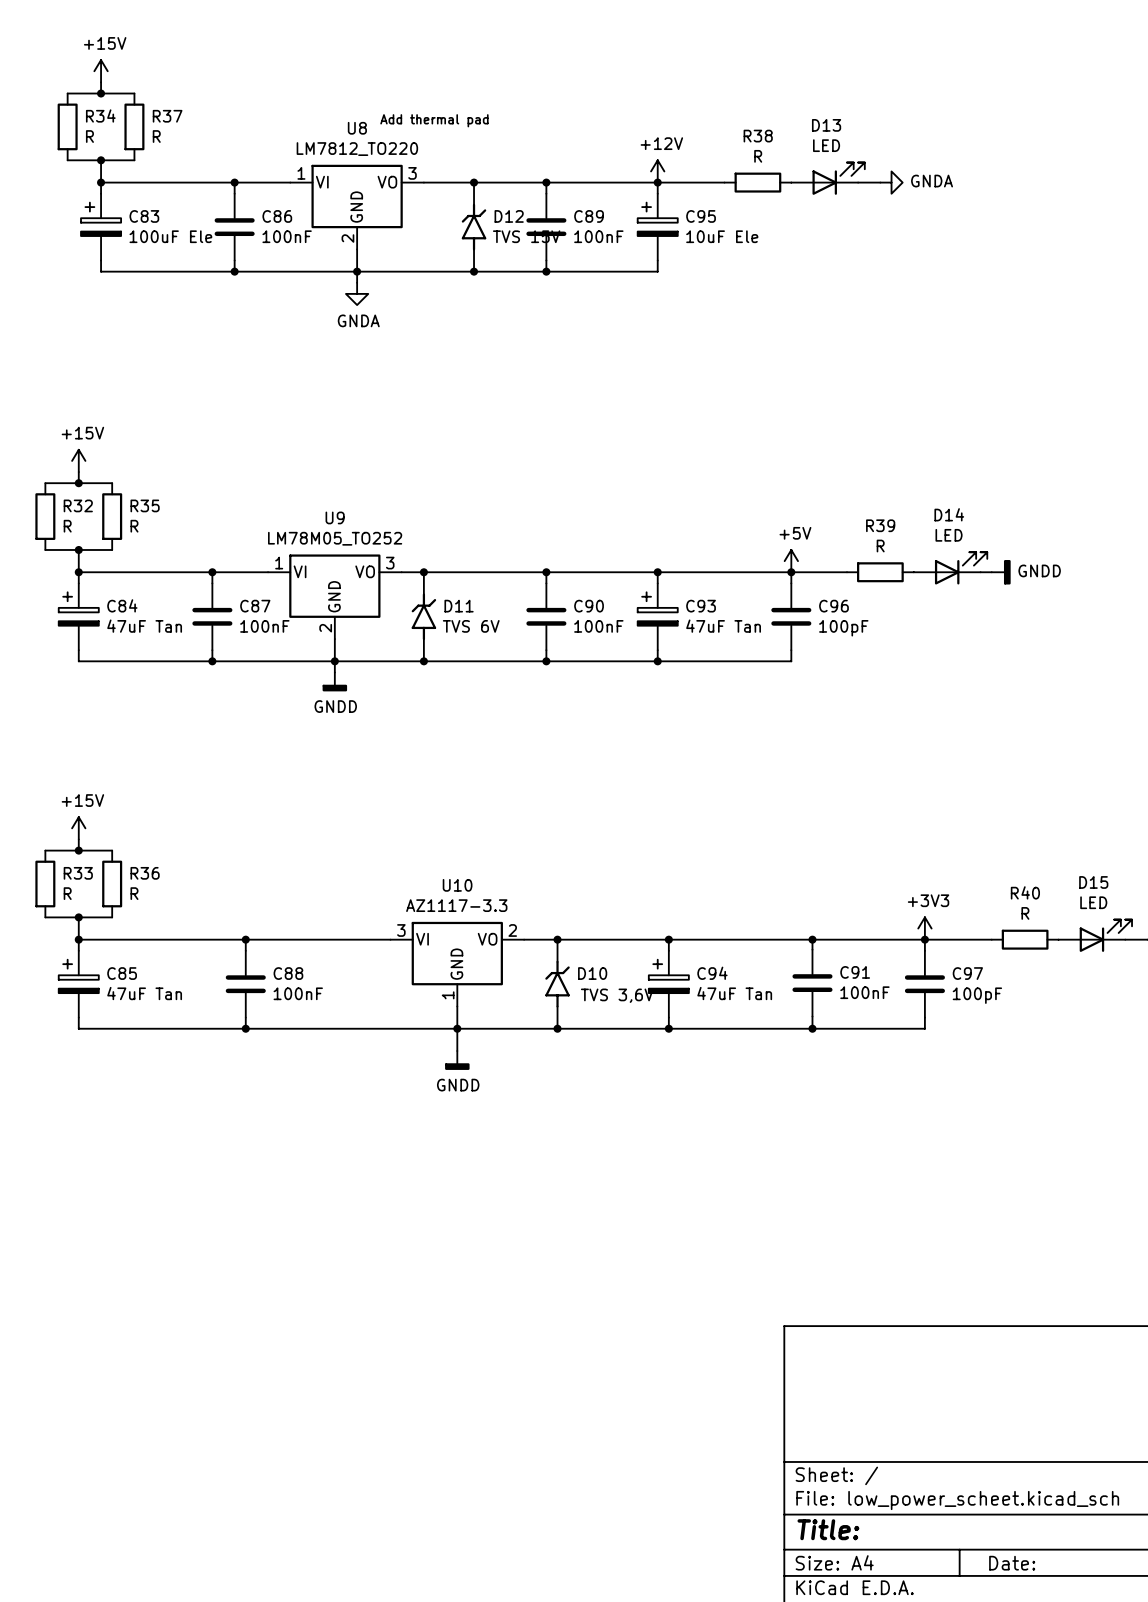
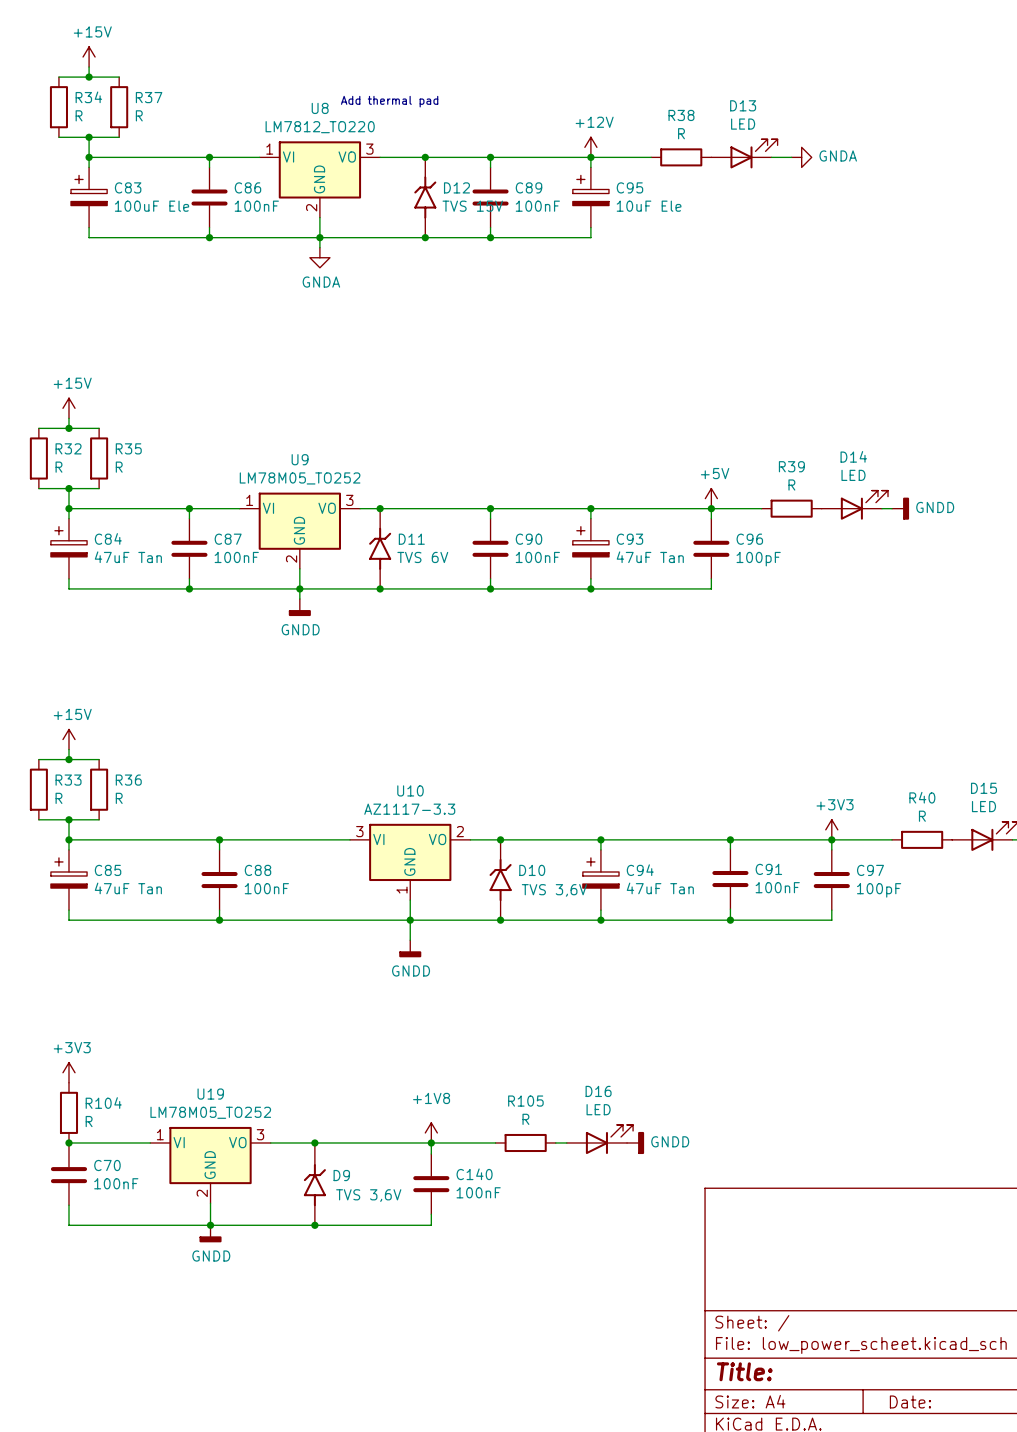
power symbol: none -> +3V3 (68, 1072)
R104: none -> R (68, 1112)
power symbol: none -> +1V8 (431, 1132)
D16: none -> LED (599, 1139)
junction: none -> (68, 1142)
wire: none -> (150, 1142) (68, 1142) (68, 1145)
wire: none -> (270, 1142) (495, 1142)
junction: none -> (314, 1142)
wire: none -> (431, 1142) (431, 1154)
junction: none -> (431, 1142)
R105: none -> R (525, 1142)
wire: none -> (555, 1142) (566, 1142)
power symbol: none -> GNDD (635, 1142)
U19: none -> LM78M05_TO252 (210, 1165)
C70: none -> 100nF (68, 1175)
C140: none -> 100nF (431, 1184)
D9: none -> TVS 3,6V (314, 1185)
wire: none -> (210, 1203) (210, 1225)
wire: none -> (68, 1205) (68, 1225) (431, 1225) (431, 1214)
junction: none -> (210, 1225)
junction: none -> (314, 1225)
power symbol: none -> GNDD (210, 1233)

